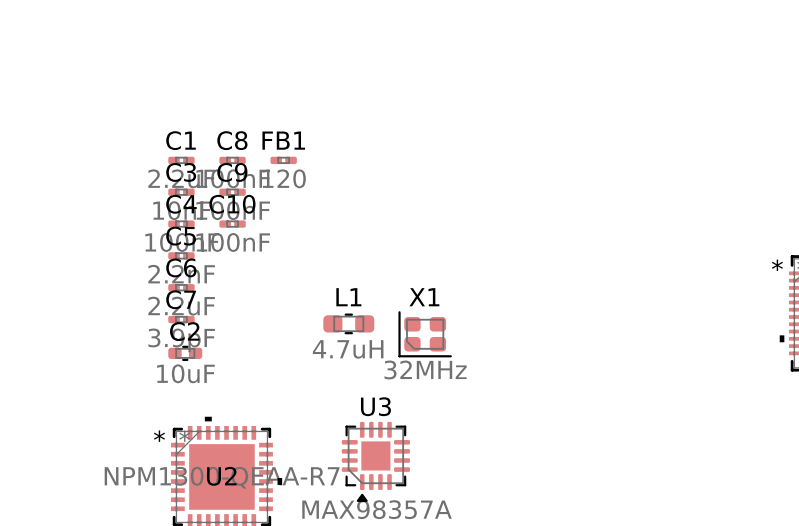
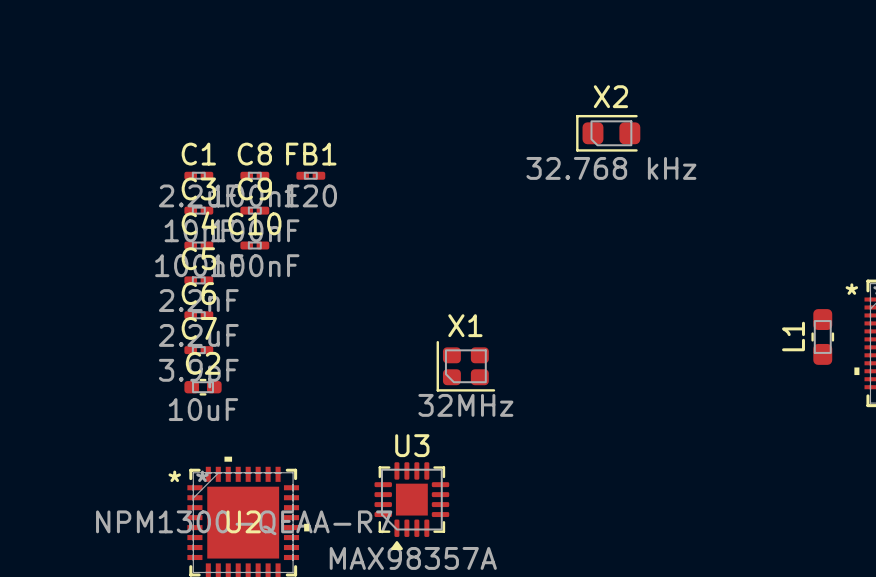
X2: none -> 32.768 kHz (608, 133)
L1 name position: L1 (348, 297) -> L1 (793, 336)
L1 rotation: 0° (348, 323) -> 90° clockwise (822, 336)
L1 position: (348, 323) -> (822, 336)
L1 value: 4.7uH (348, 349) -> none

